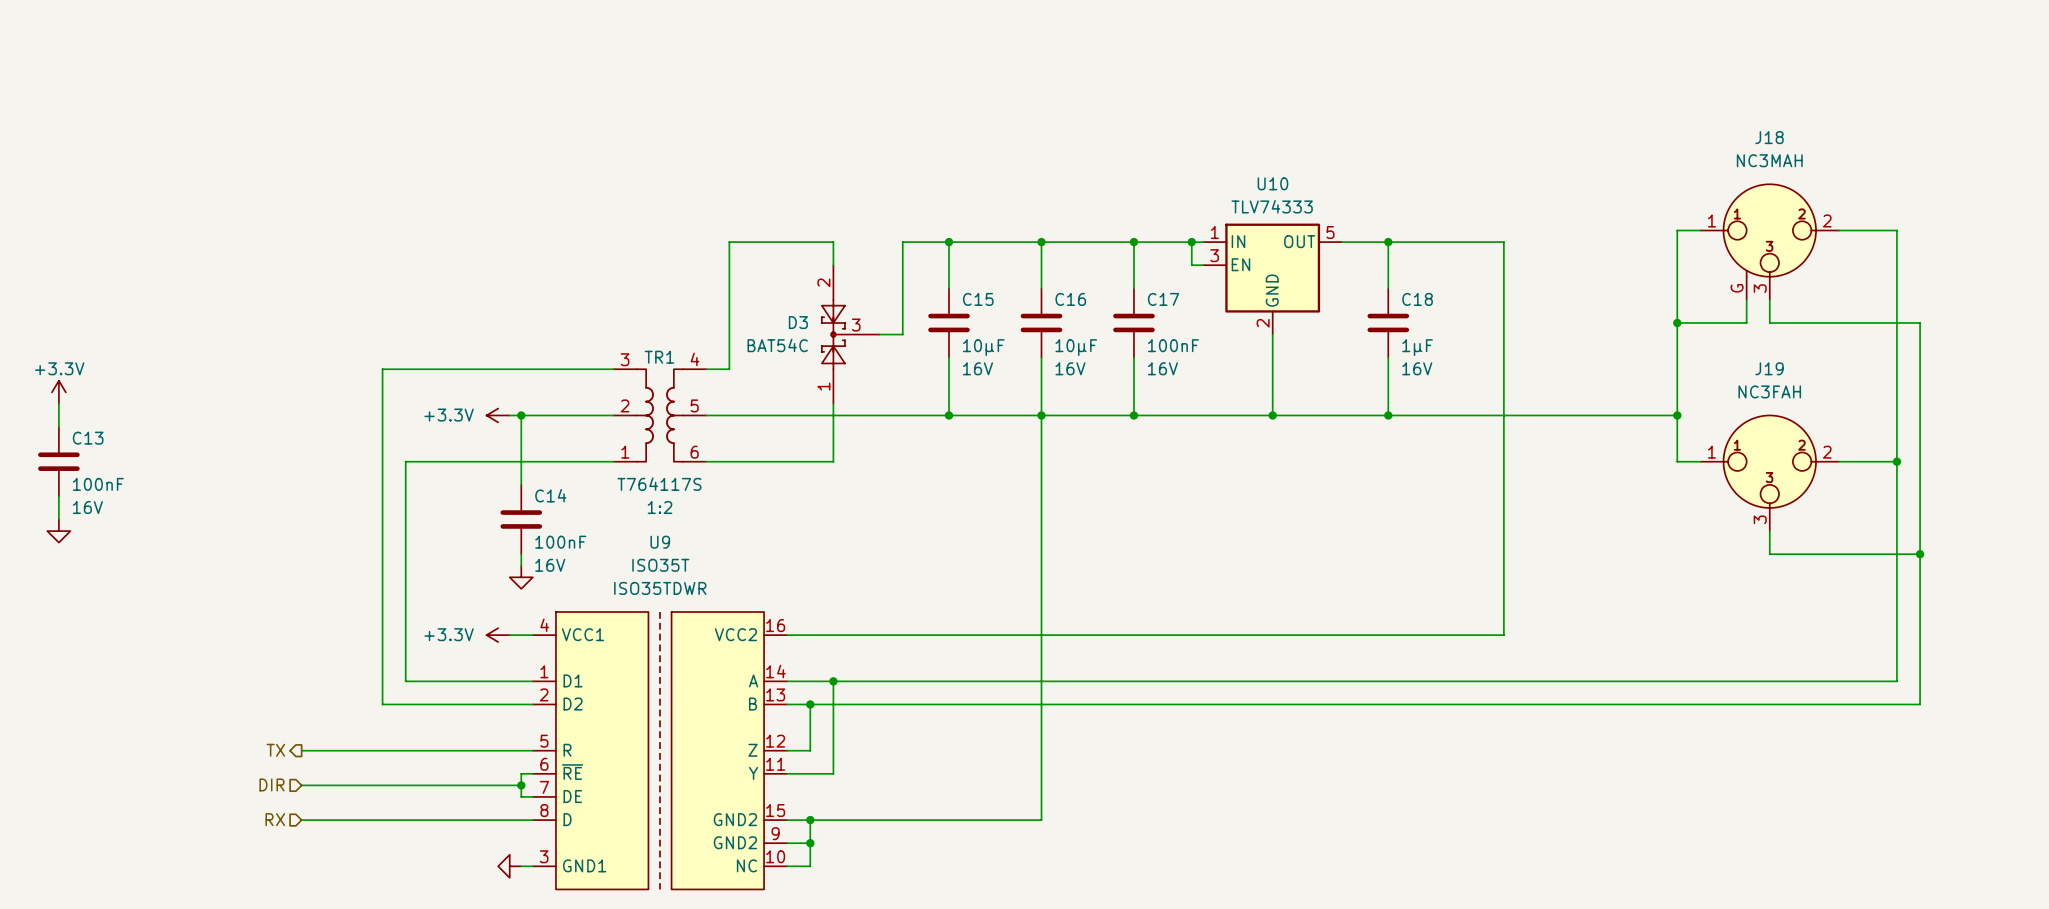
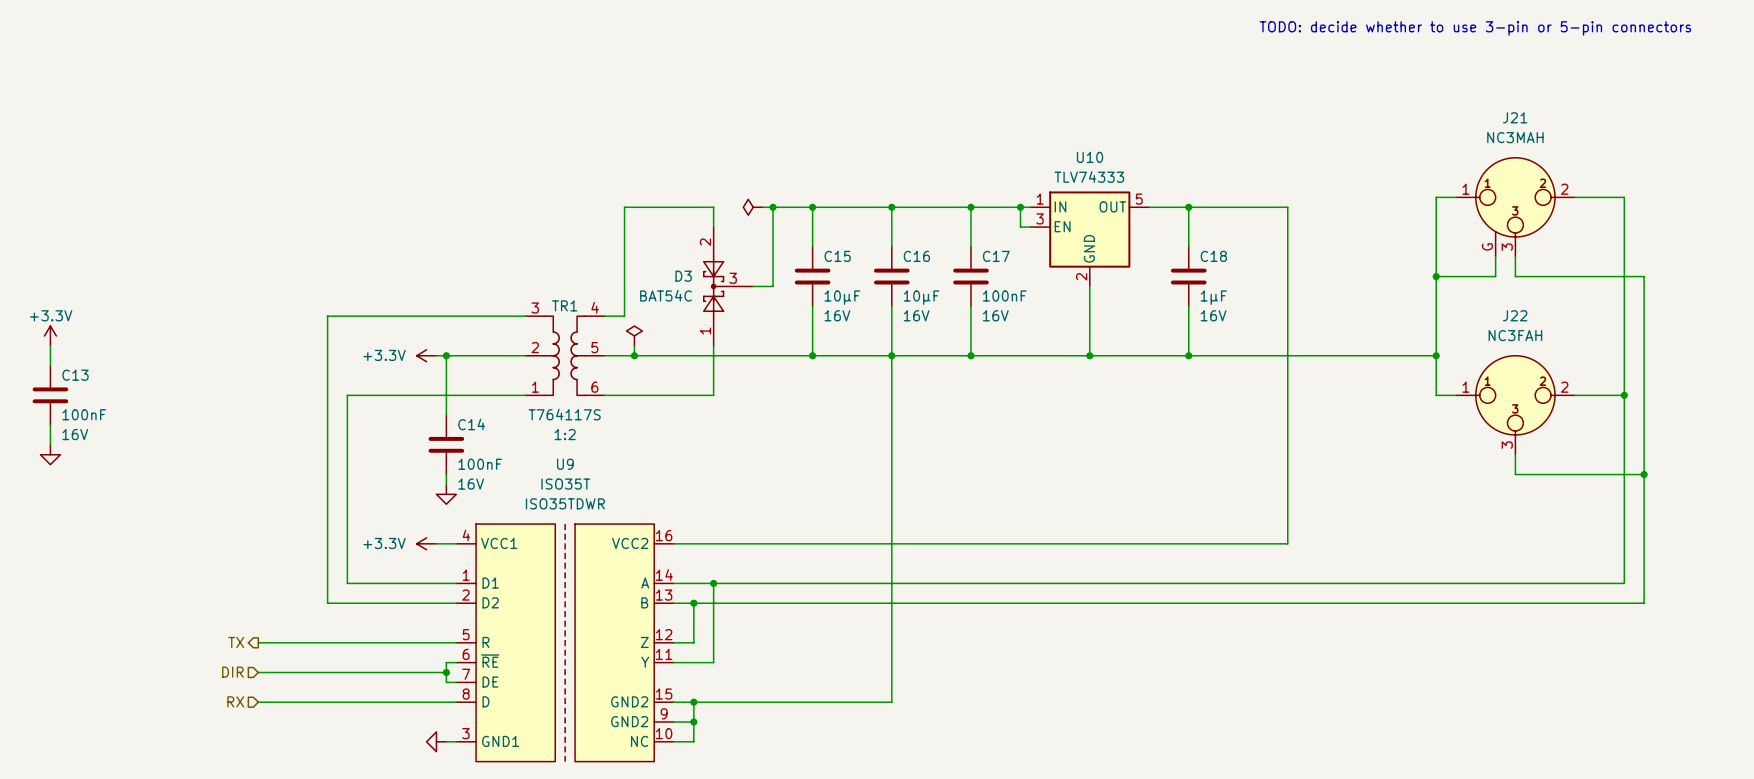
text: none -> TODO: decide whether to use 3-pin or 5-pin connectors (1475, 28)
J18 name: J18 (1769, 137) -> J21 (1515, 117)
power symbol: none -> (753, 207)
wire: none -> (763, 207) (773, 207)
junction: none -> (773, 207)
J19 name: J19 (1769, 368) -> J22 (1515, 315)
power symbol: none -> (634, 335)
wire: none -> (634, 345) (634, 355)
junction: none -> (634, 355)

